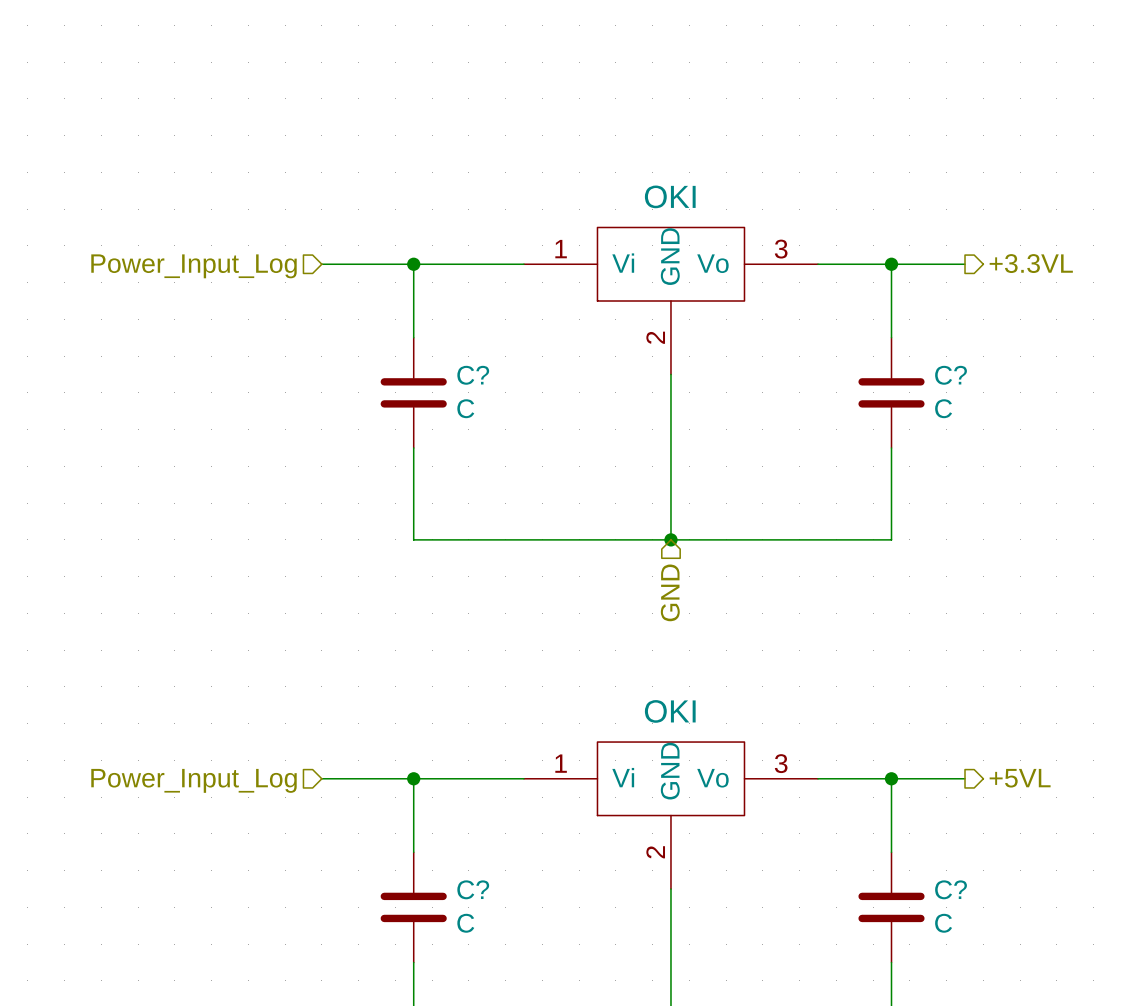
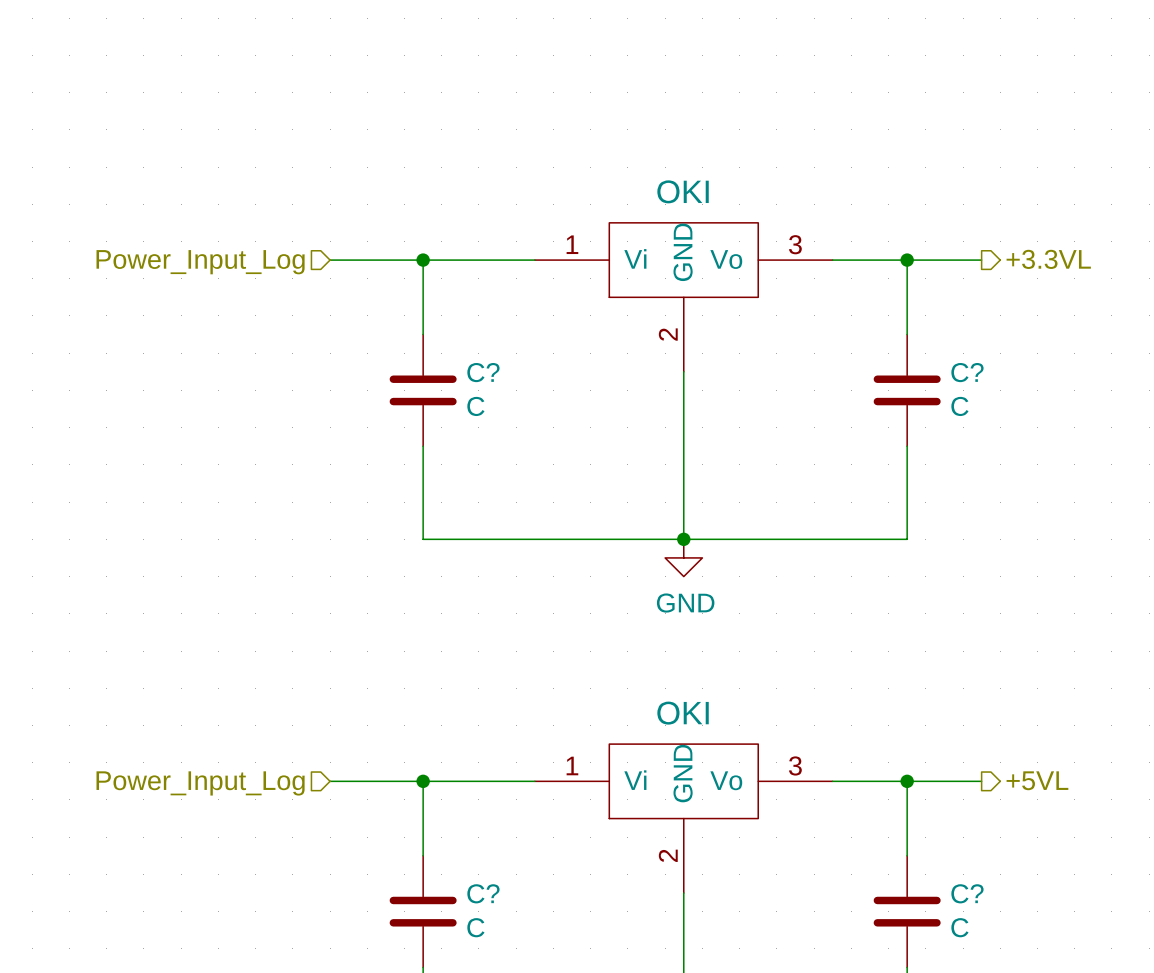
power symbol: none -> GND (683, 557)
hierarchical label: GND (670, 592) -> none

